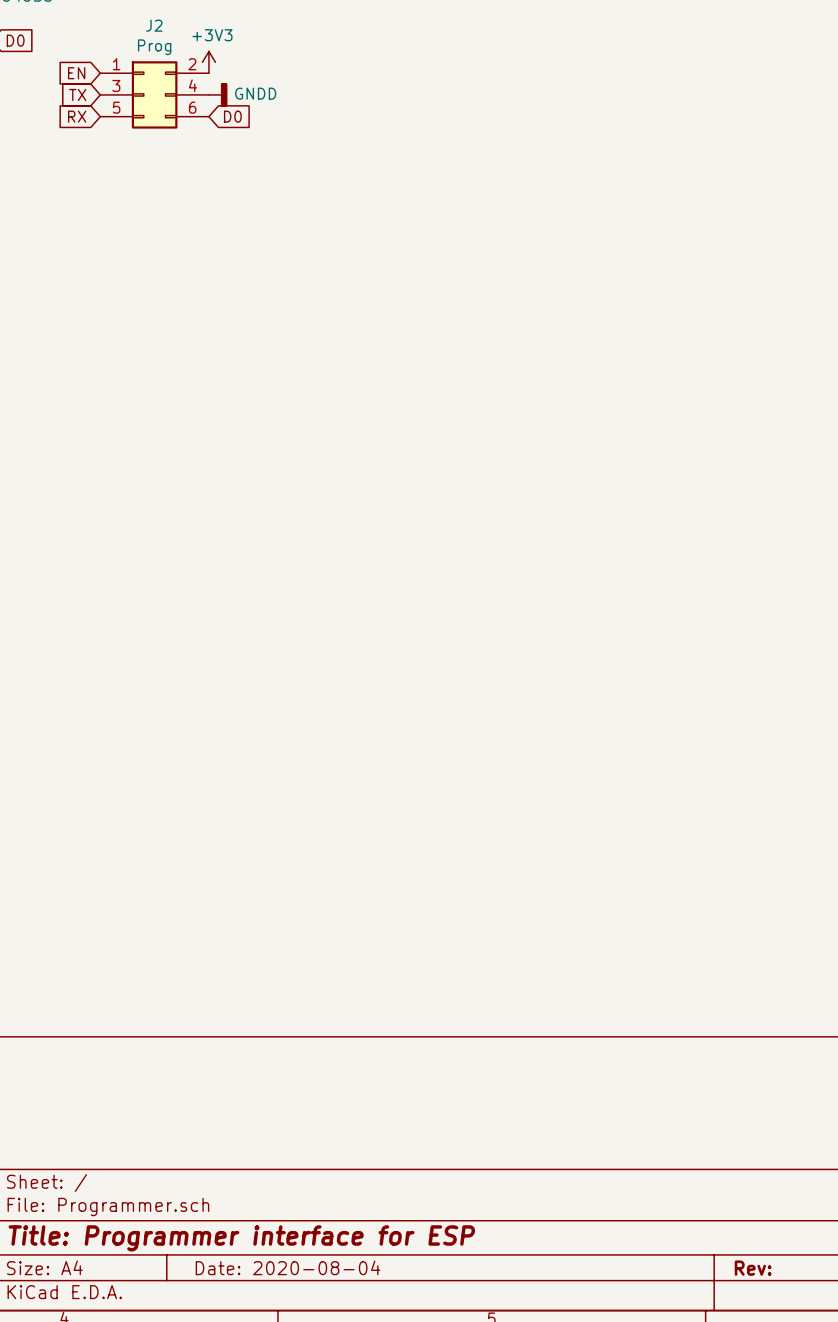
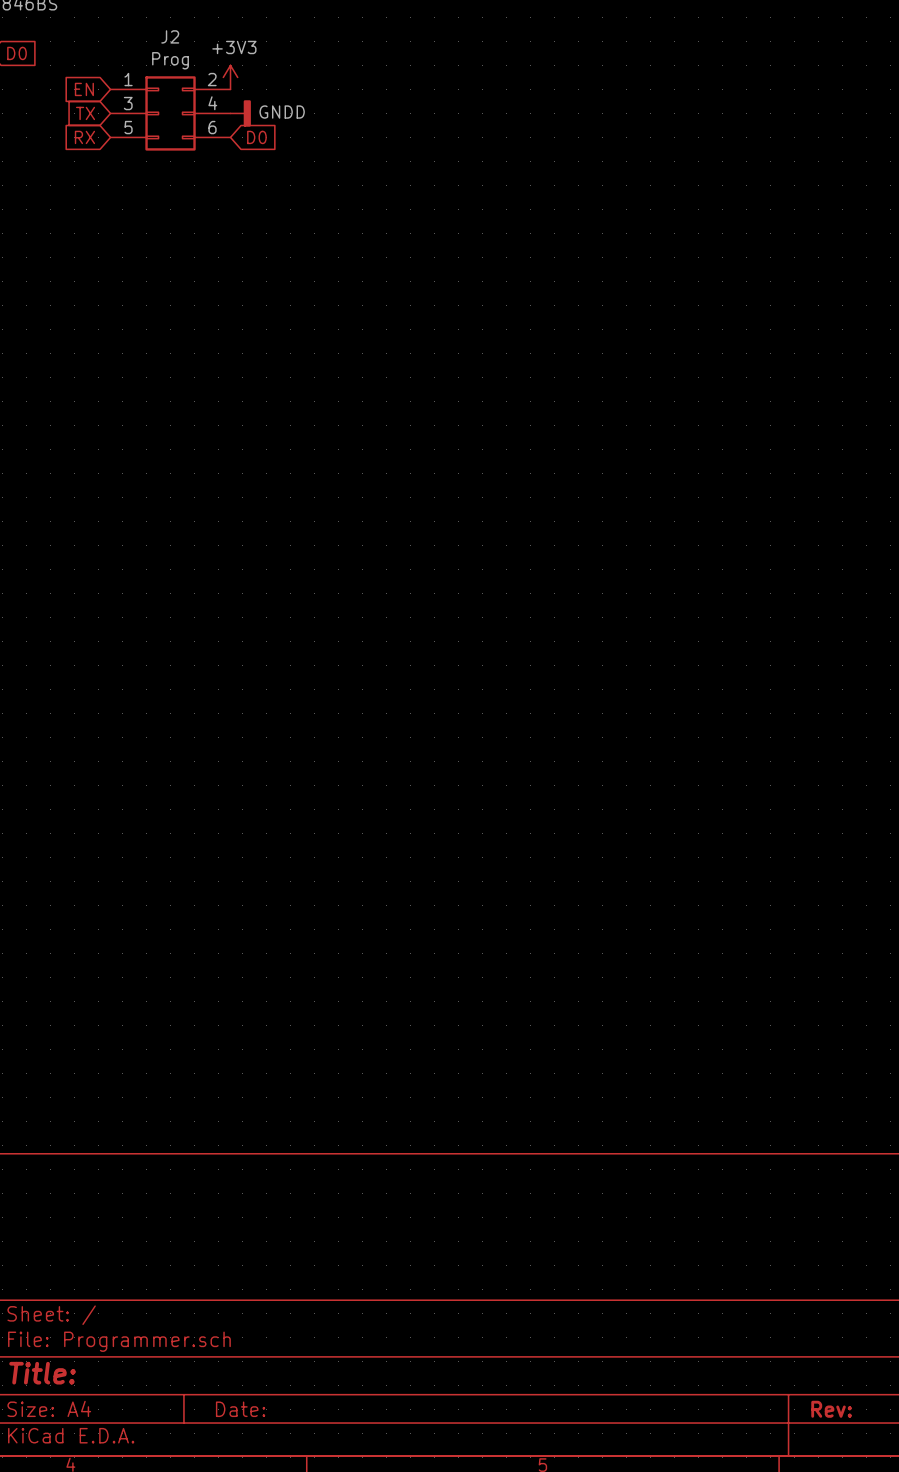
title block: Title: Programmer interface for ESP (241, 1238) -> Title: (42, 1373)
title block: Date: 2020-08-04 (288, 1267) -> Date: (240, 1409)

